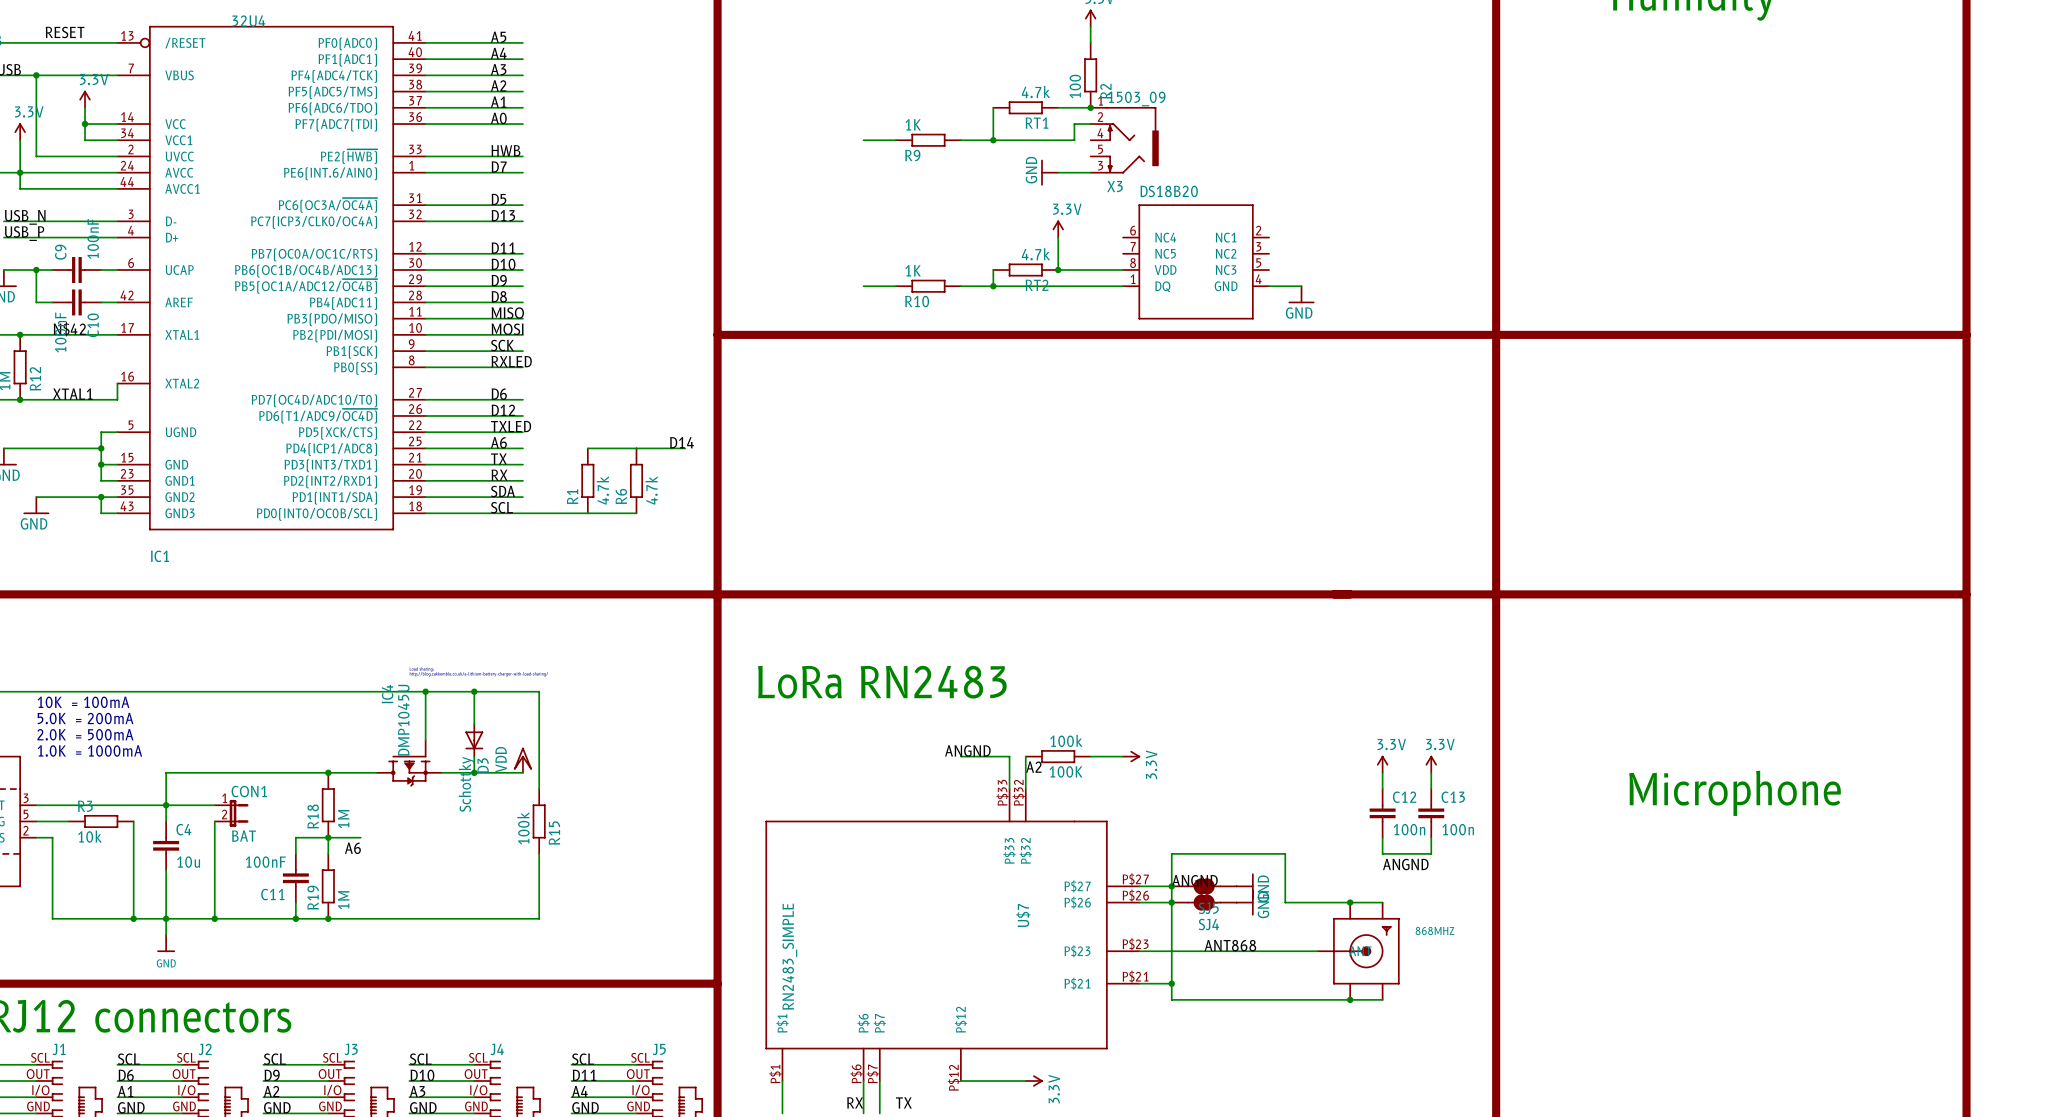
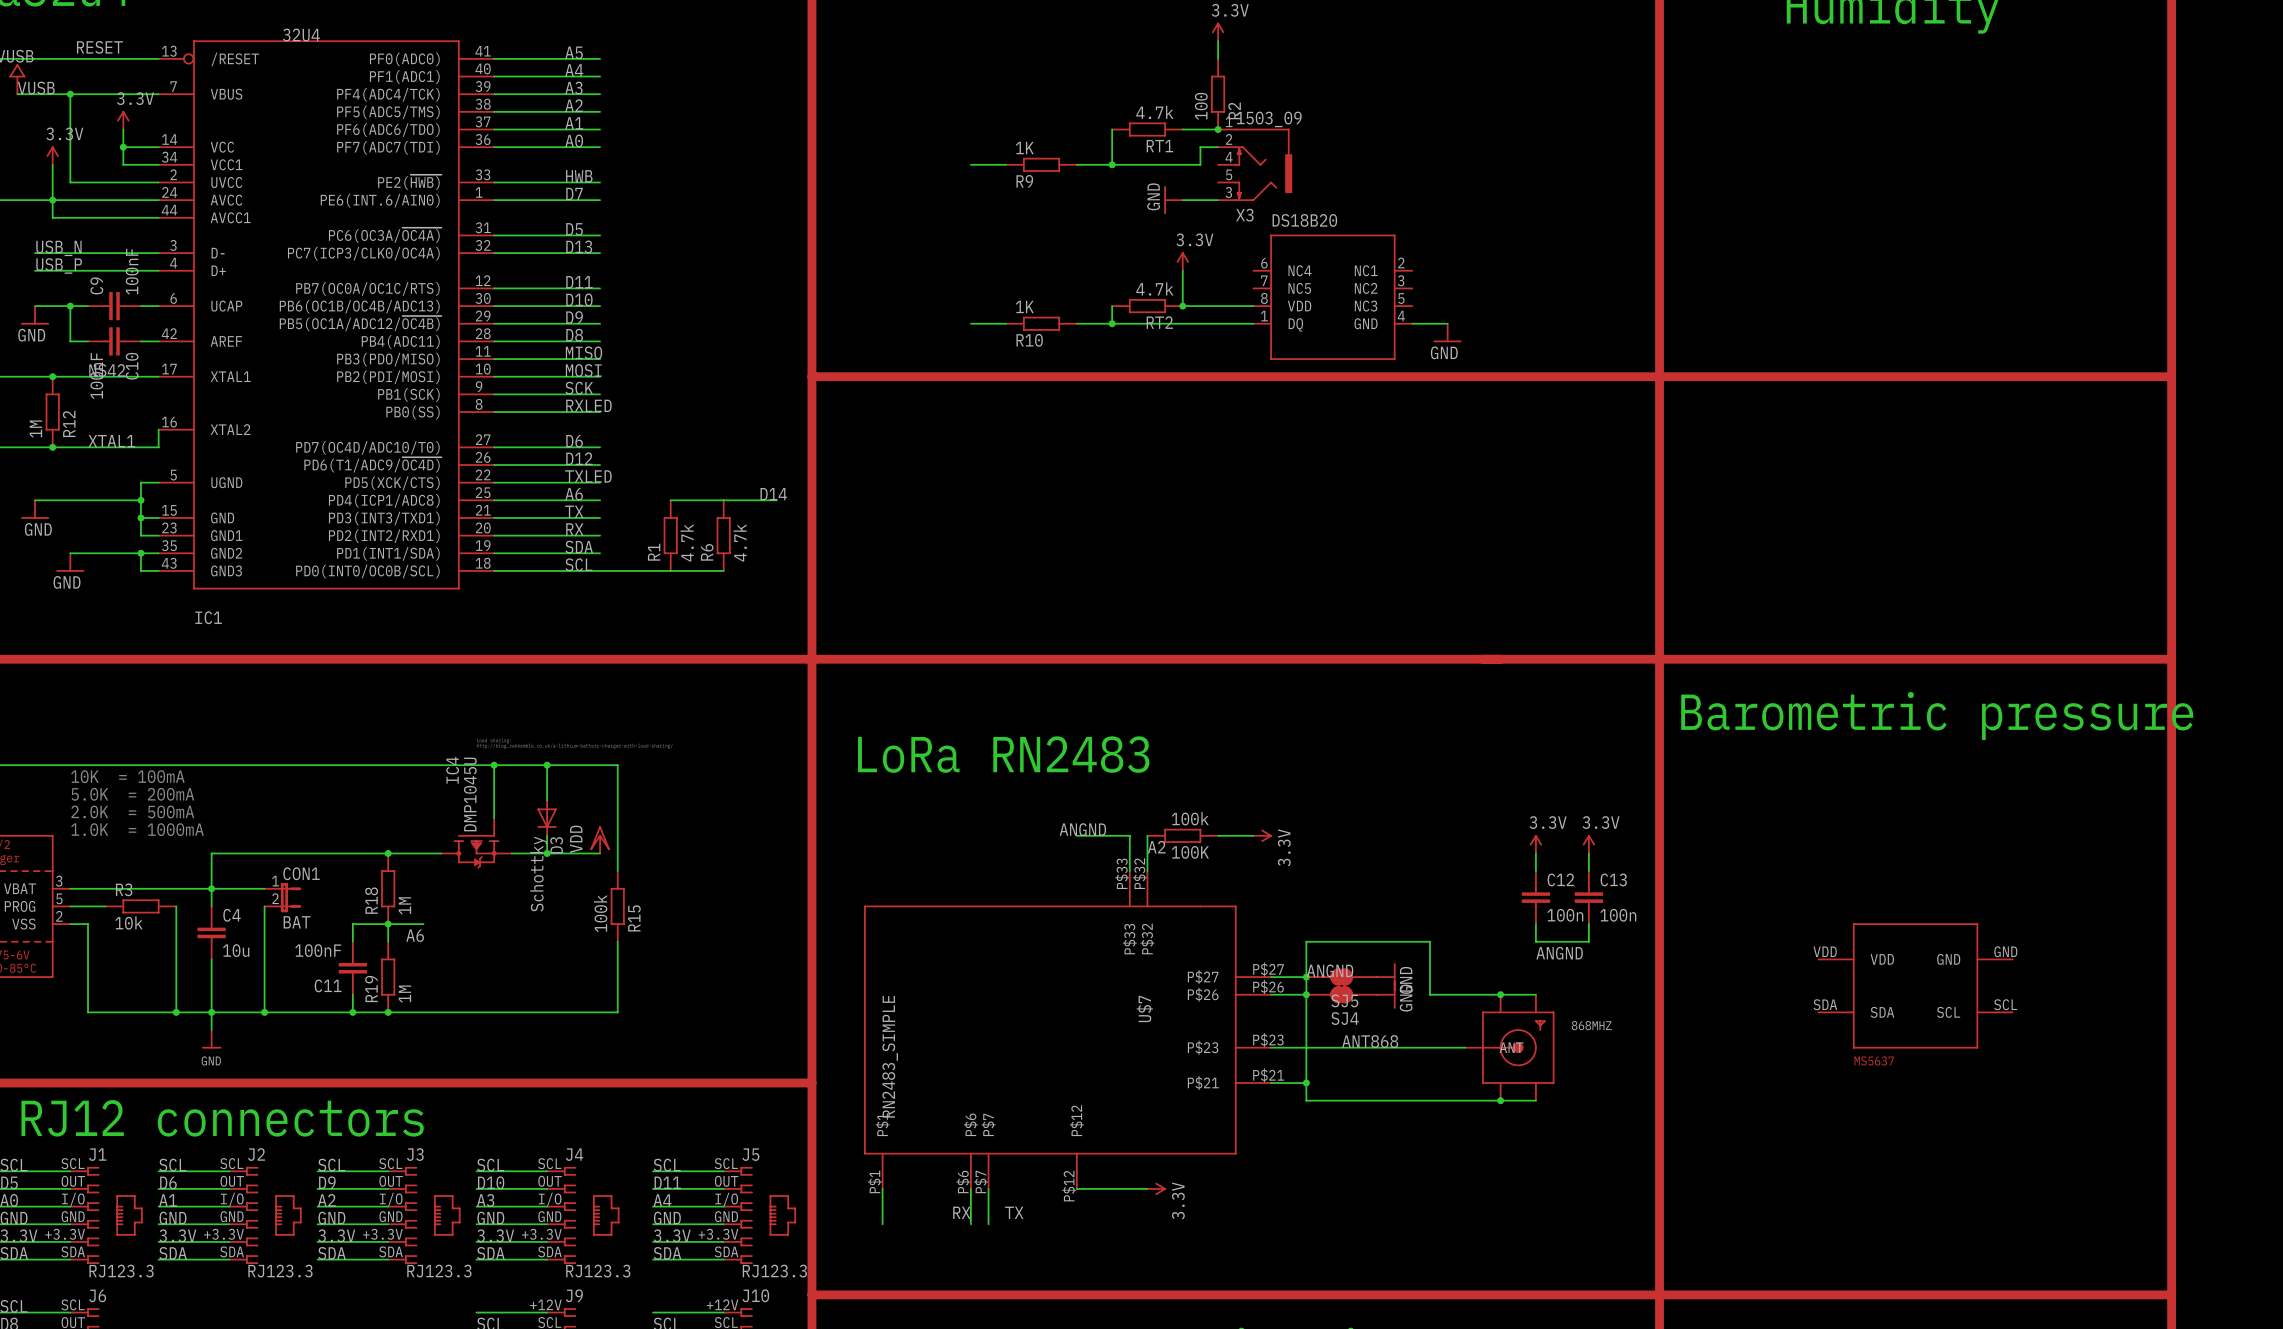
text: none -> Barometric pressure (1937, 716)
text: Microphone (1735, 793) -> none
part: none -> (1915, 985)

